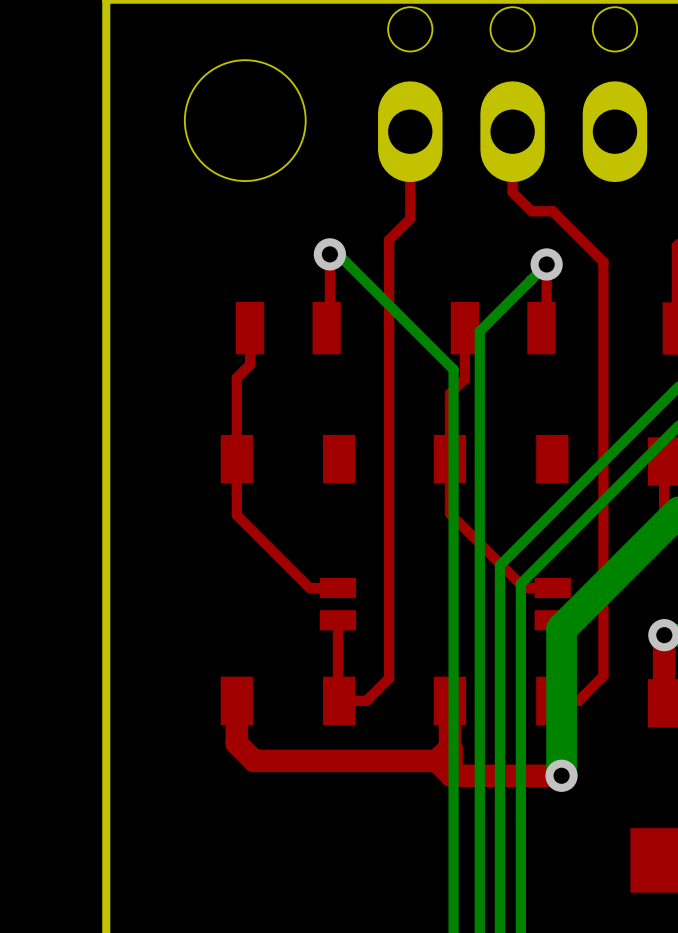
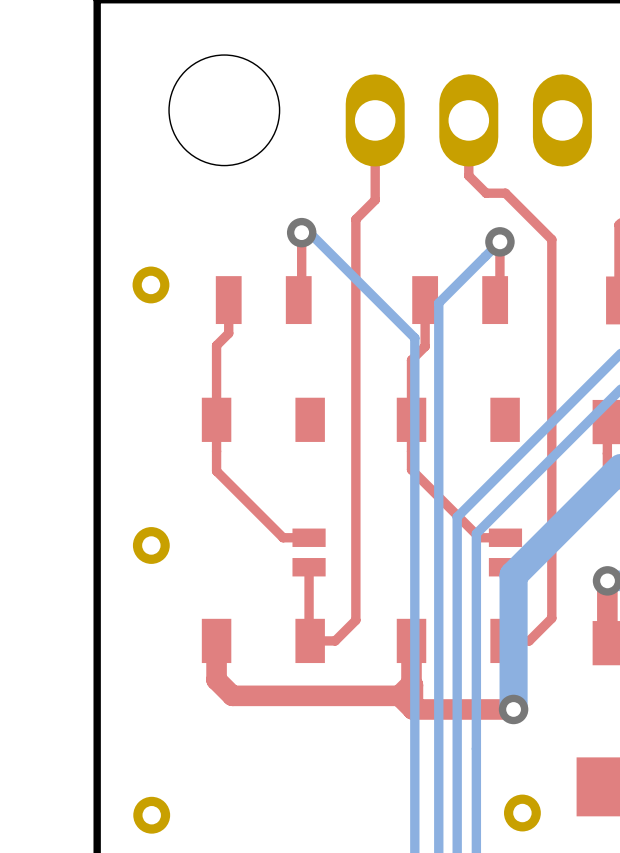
part footprint: [378, 7, 648, 183] -> [345, 74, 592, 167]
part: none -> (150, 284)
part: none -> (151, 545)
part: none -> (522, 813)
part: none -> (151, 815)

